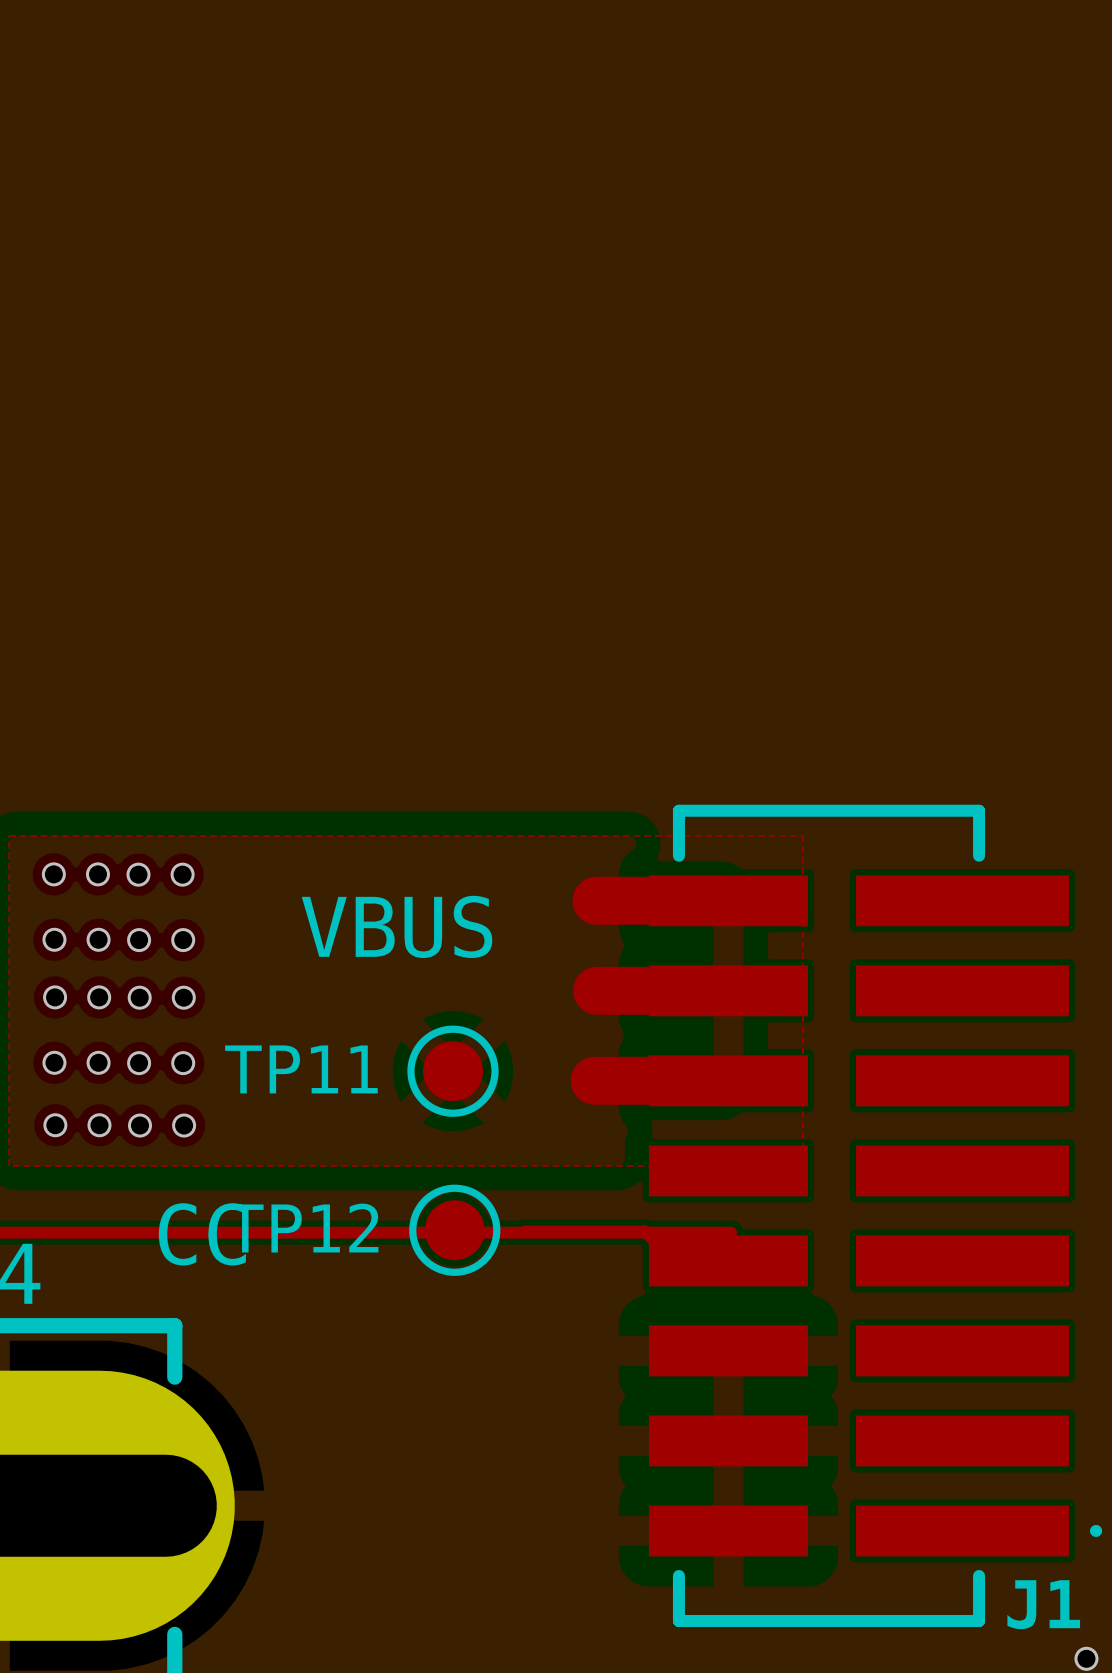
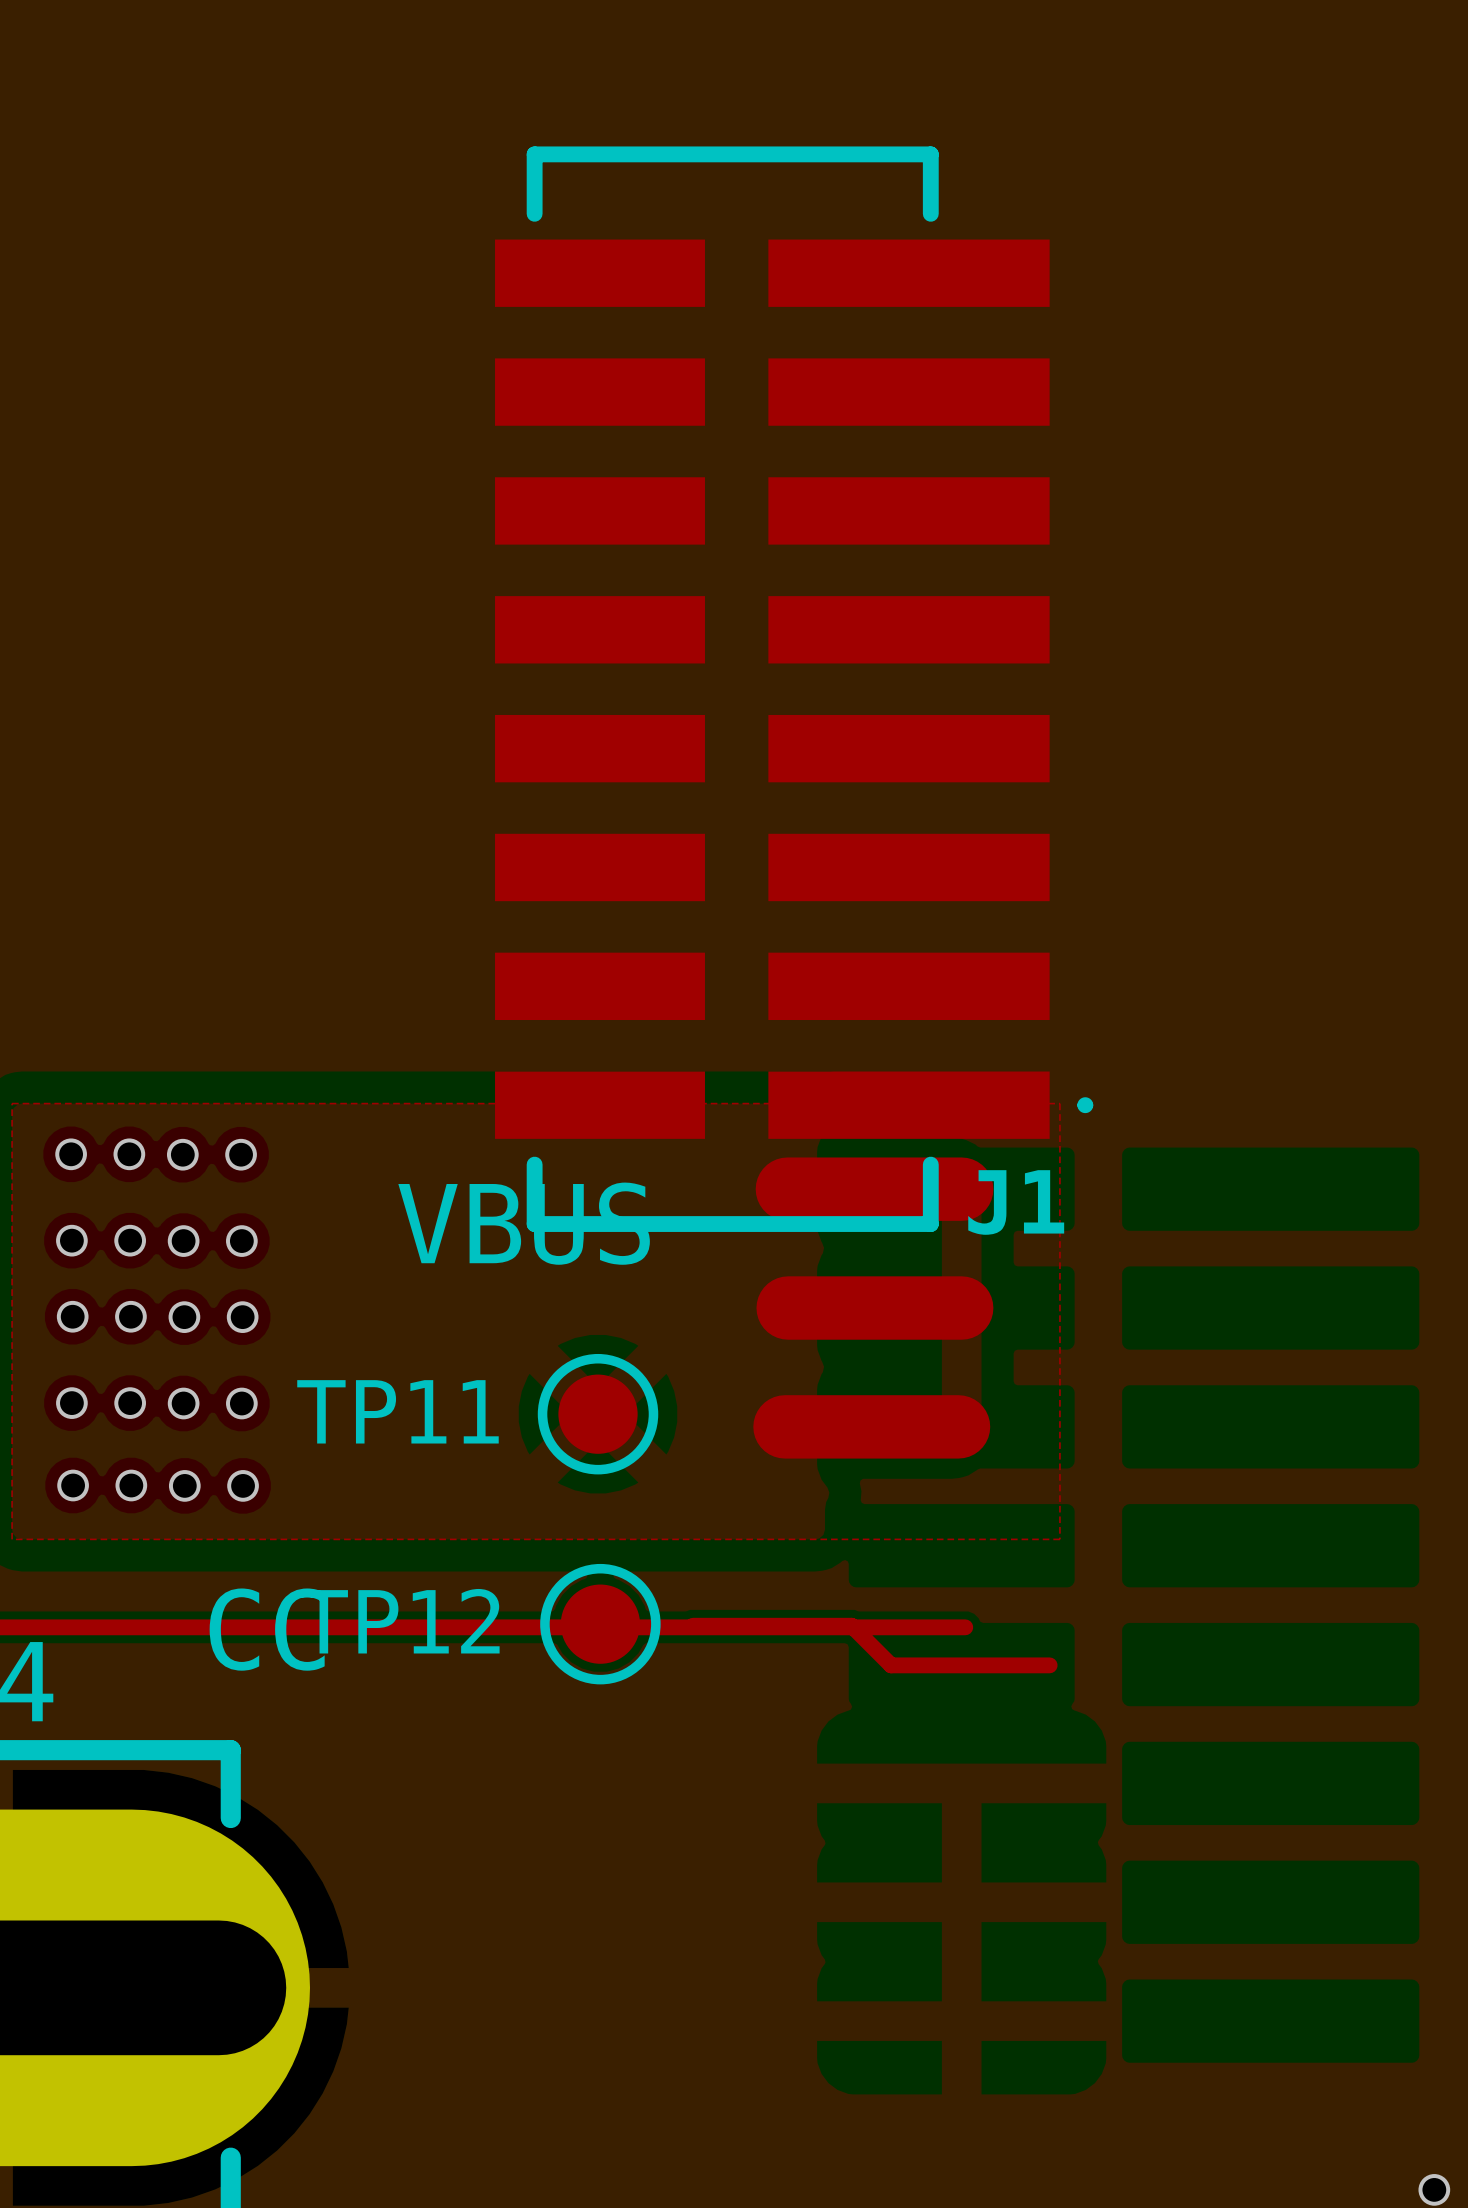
J1 position: (875, 1215) -> (794, 689)

